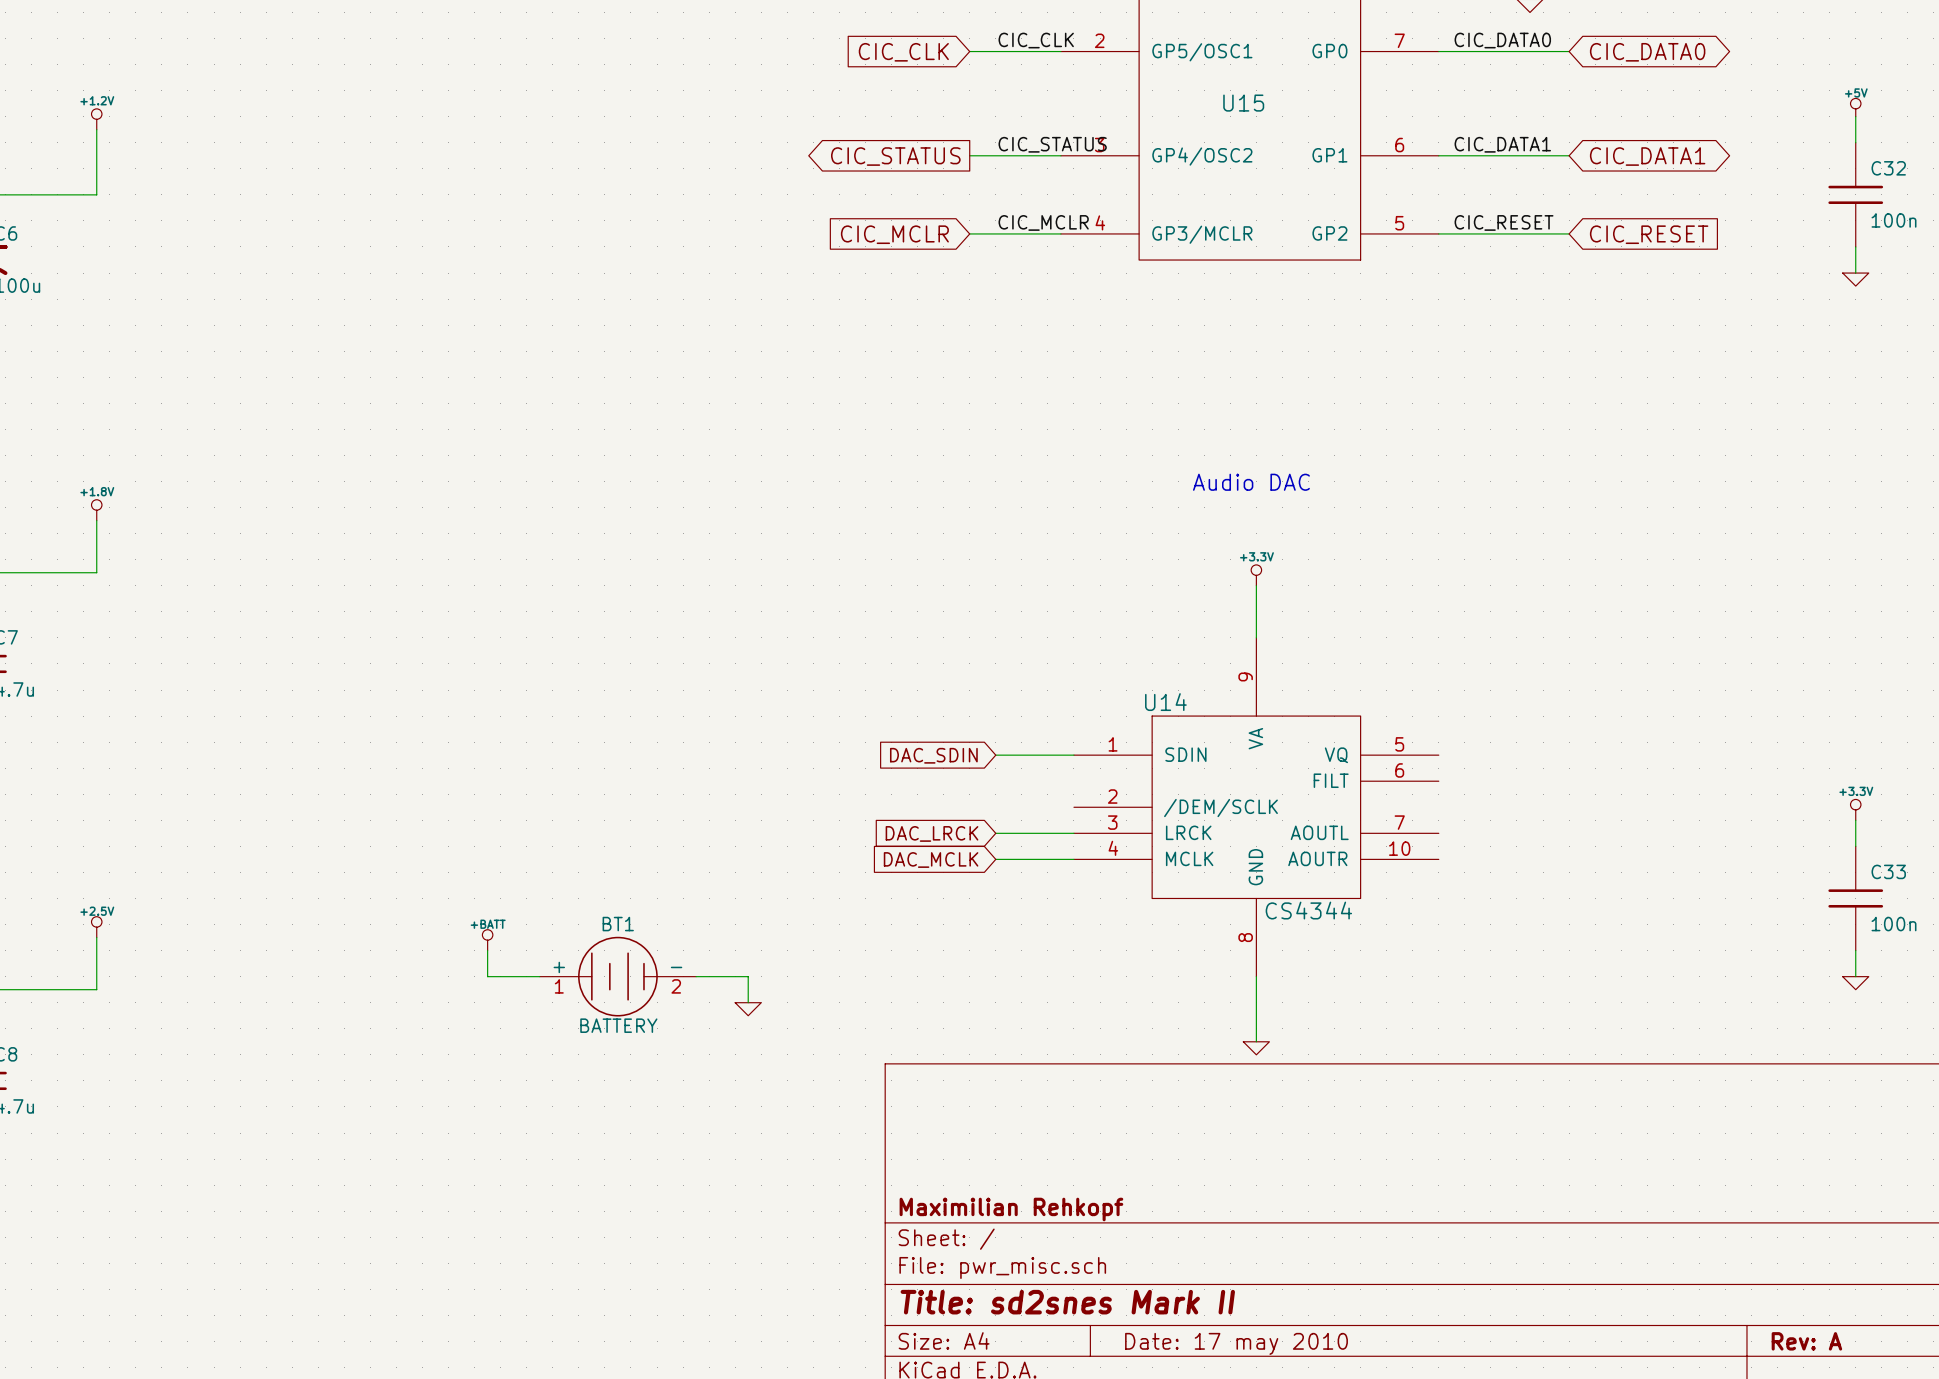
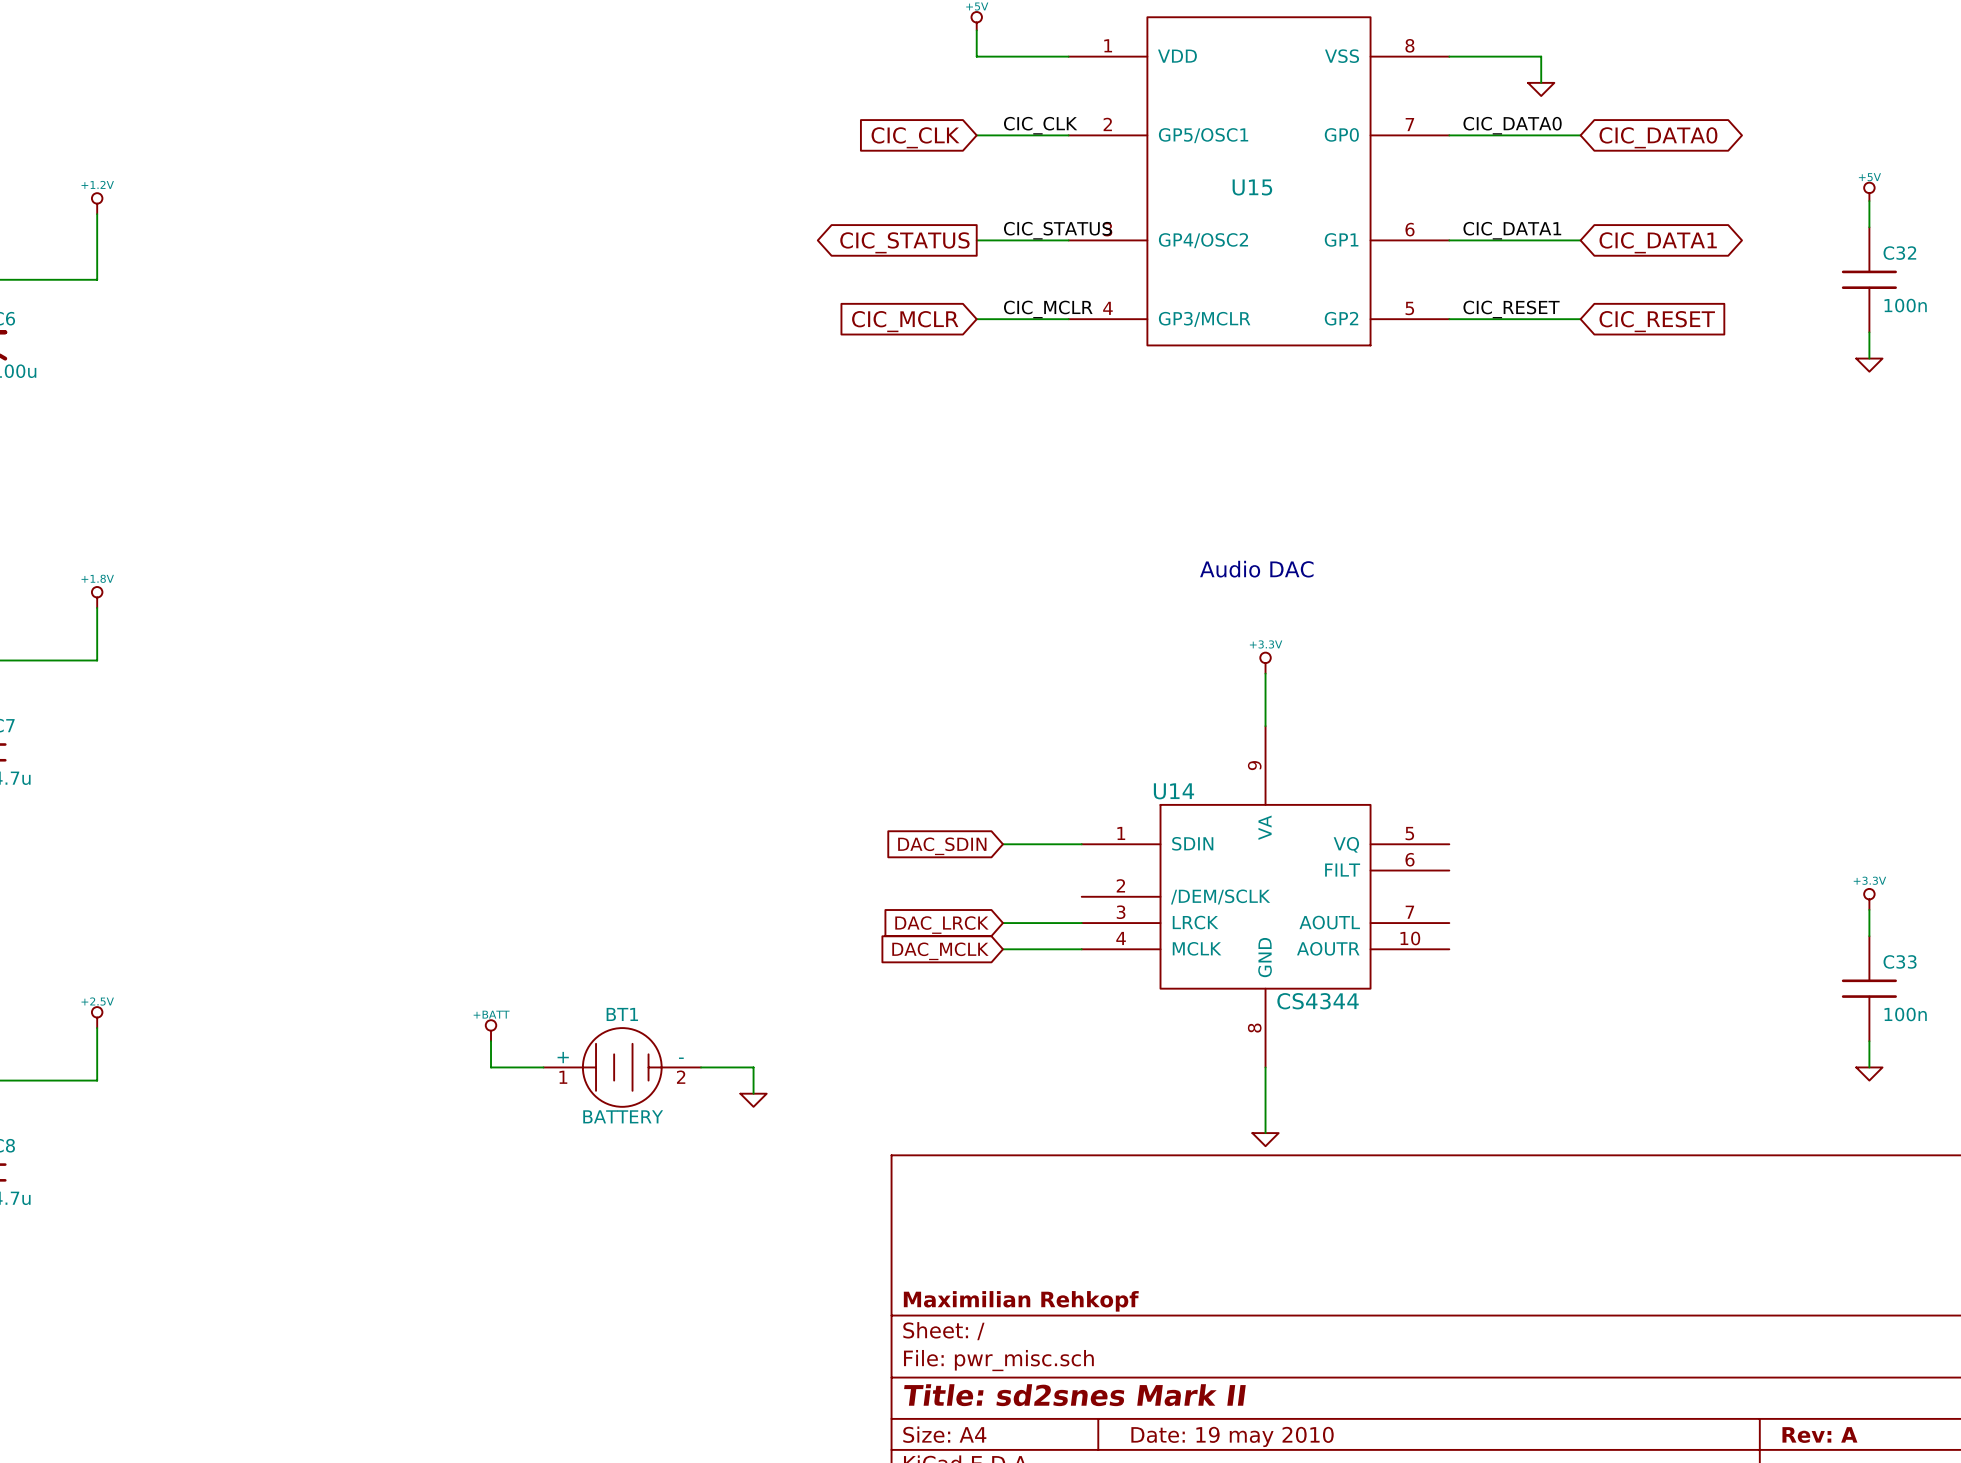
title block: Date: 17 may 2010 (1236, 1343) -> Date: 19 may 2010 (1232, 1436)

